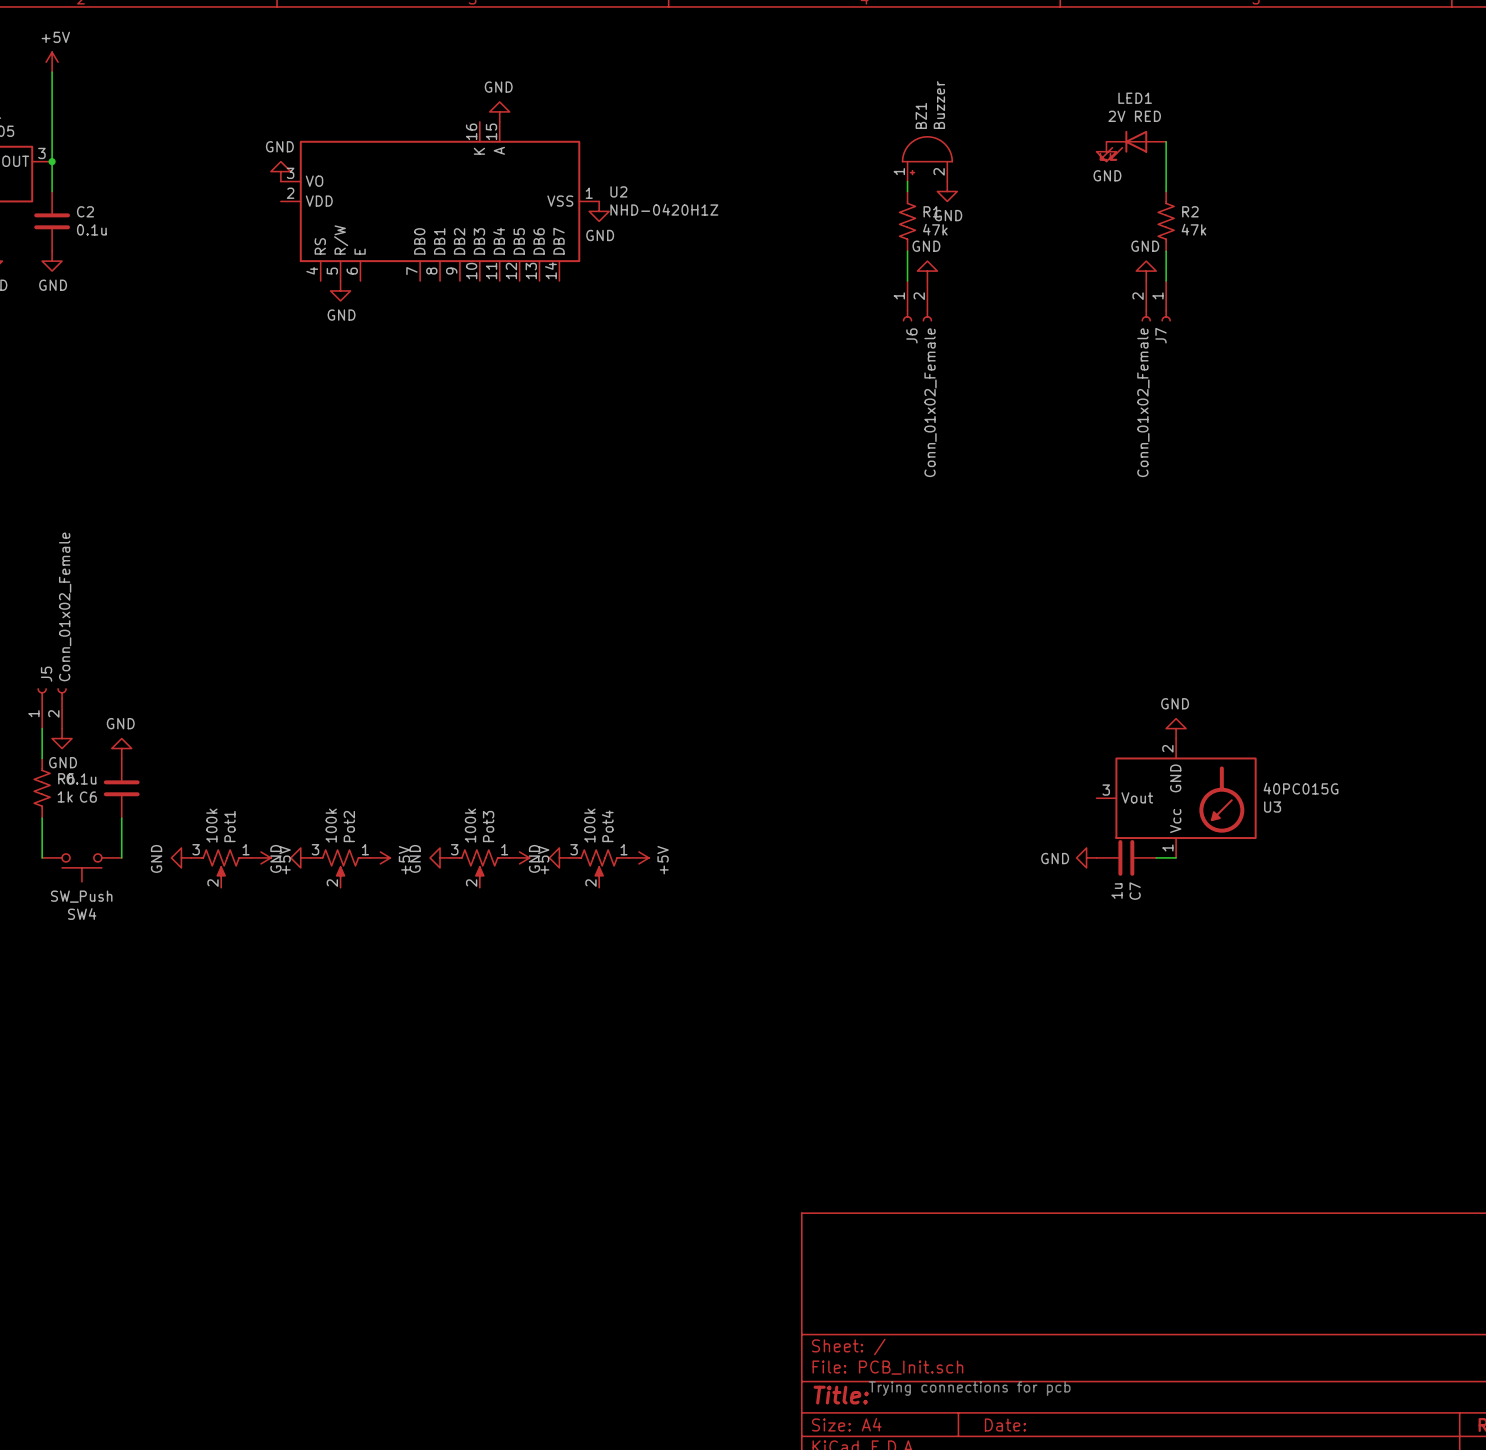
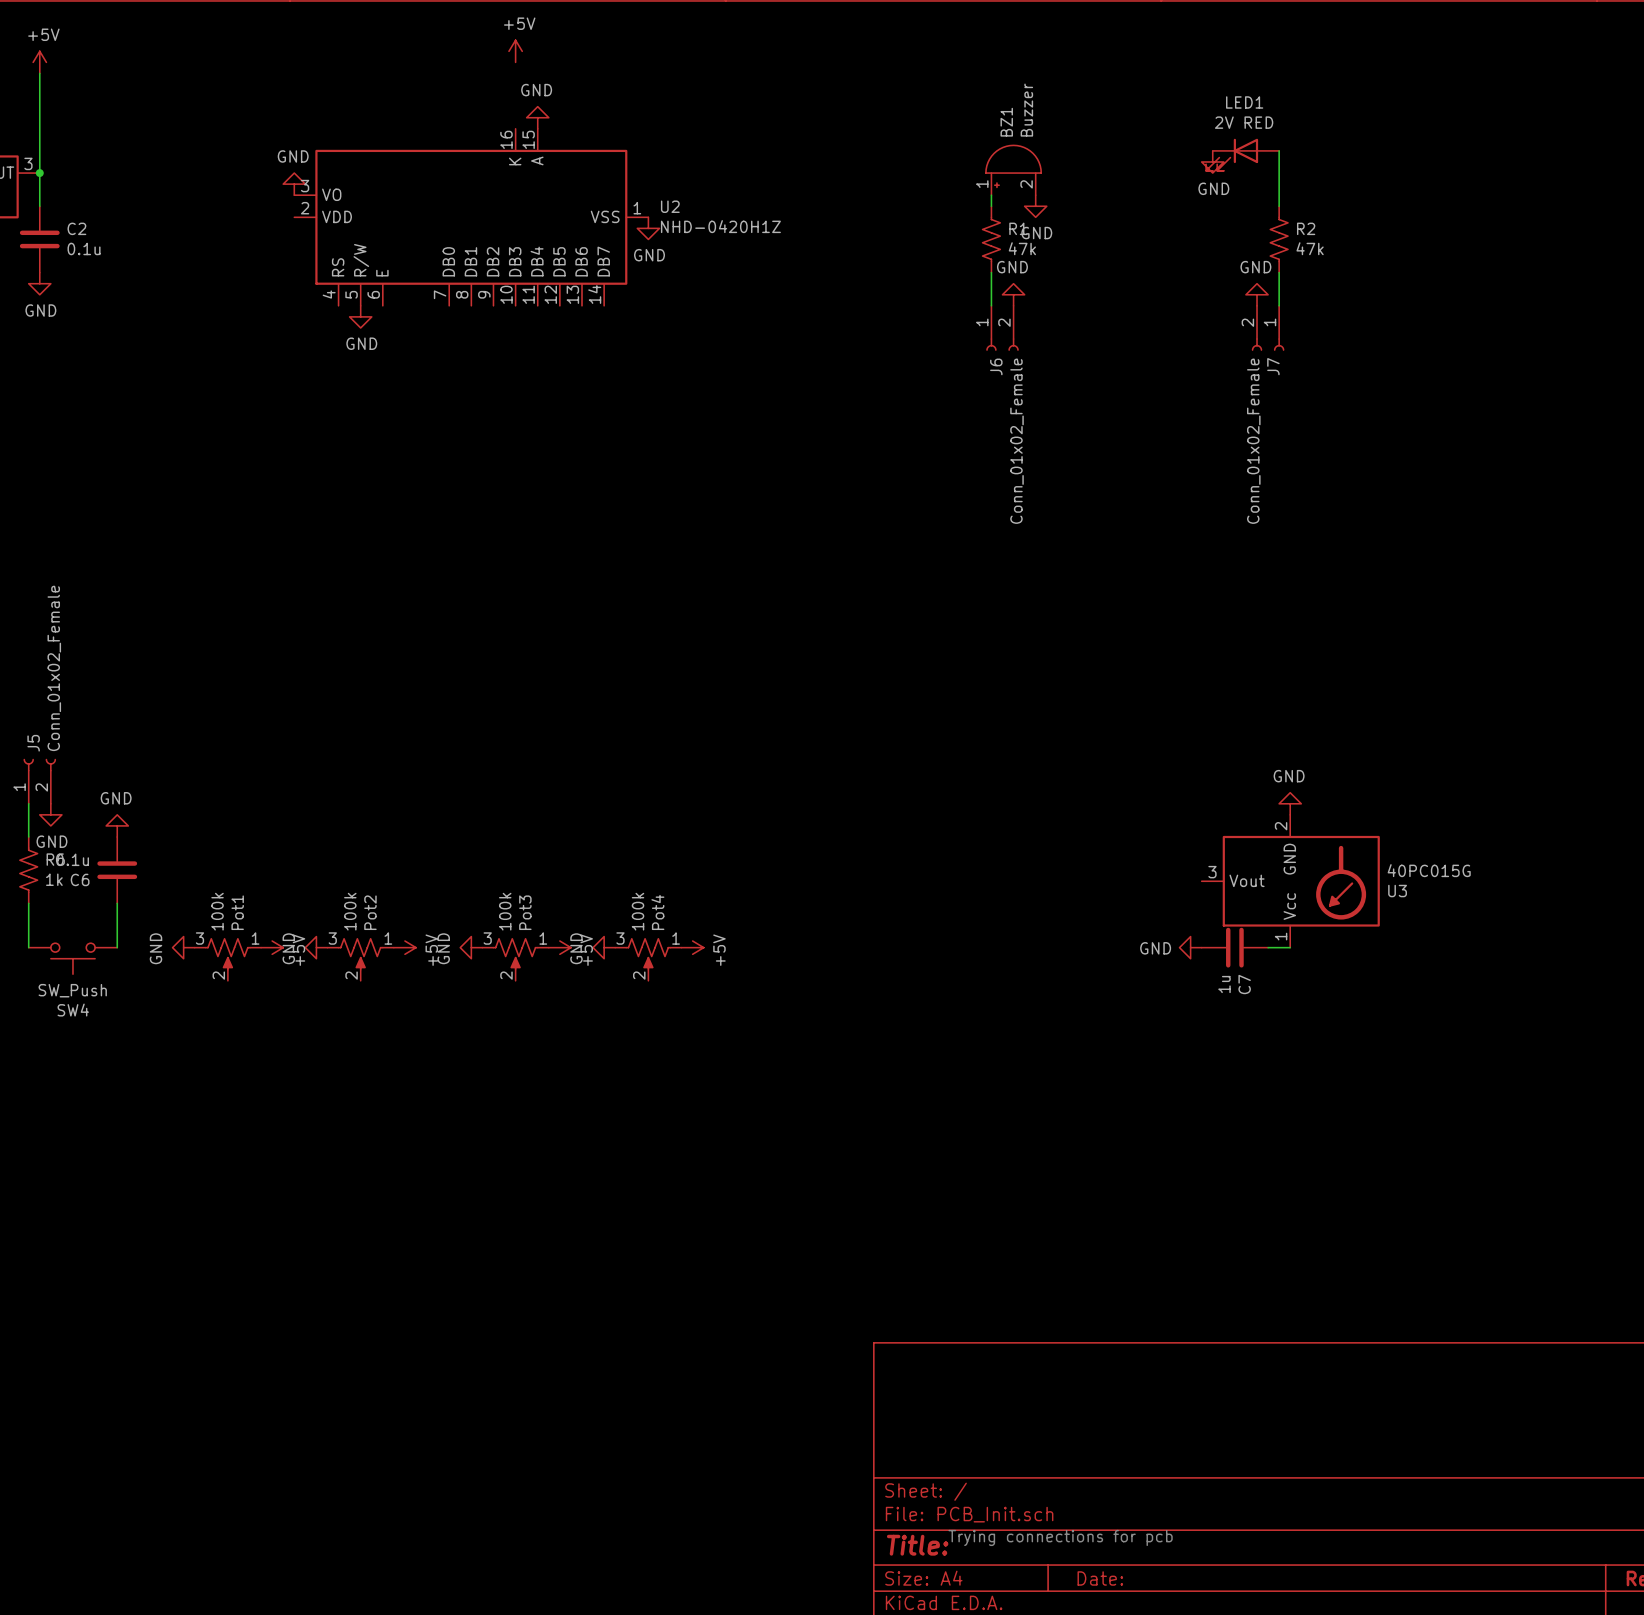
power symbol: none -> +5V (515, 51)

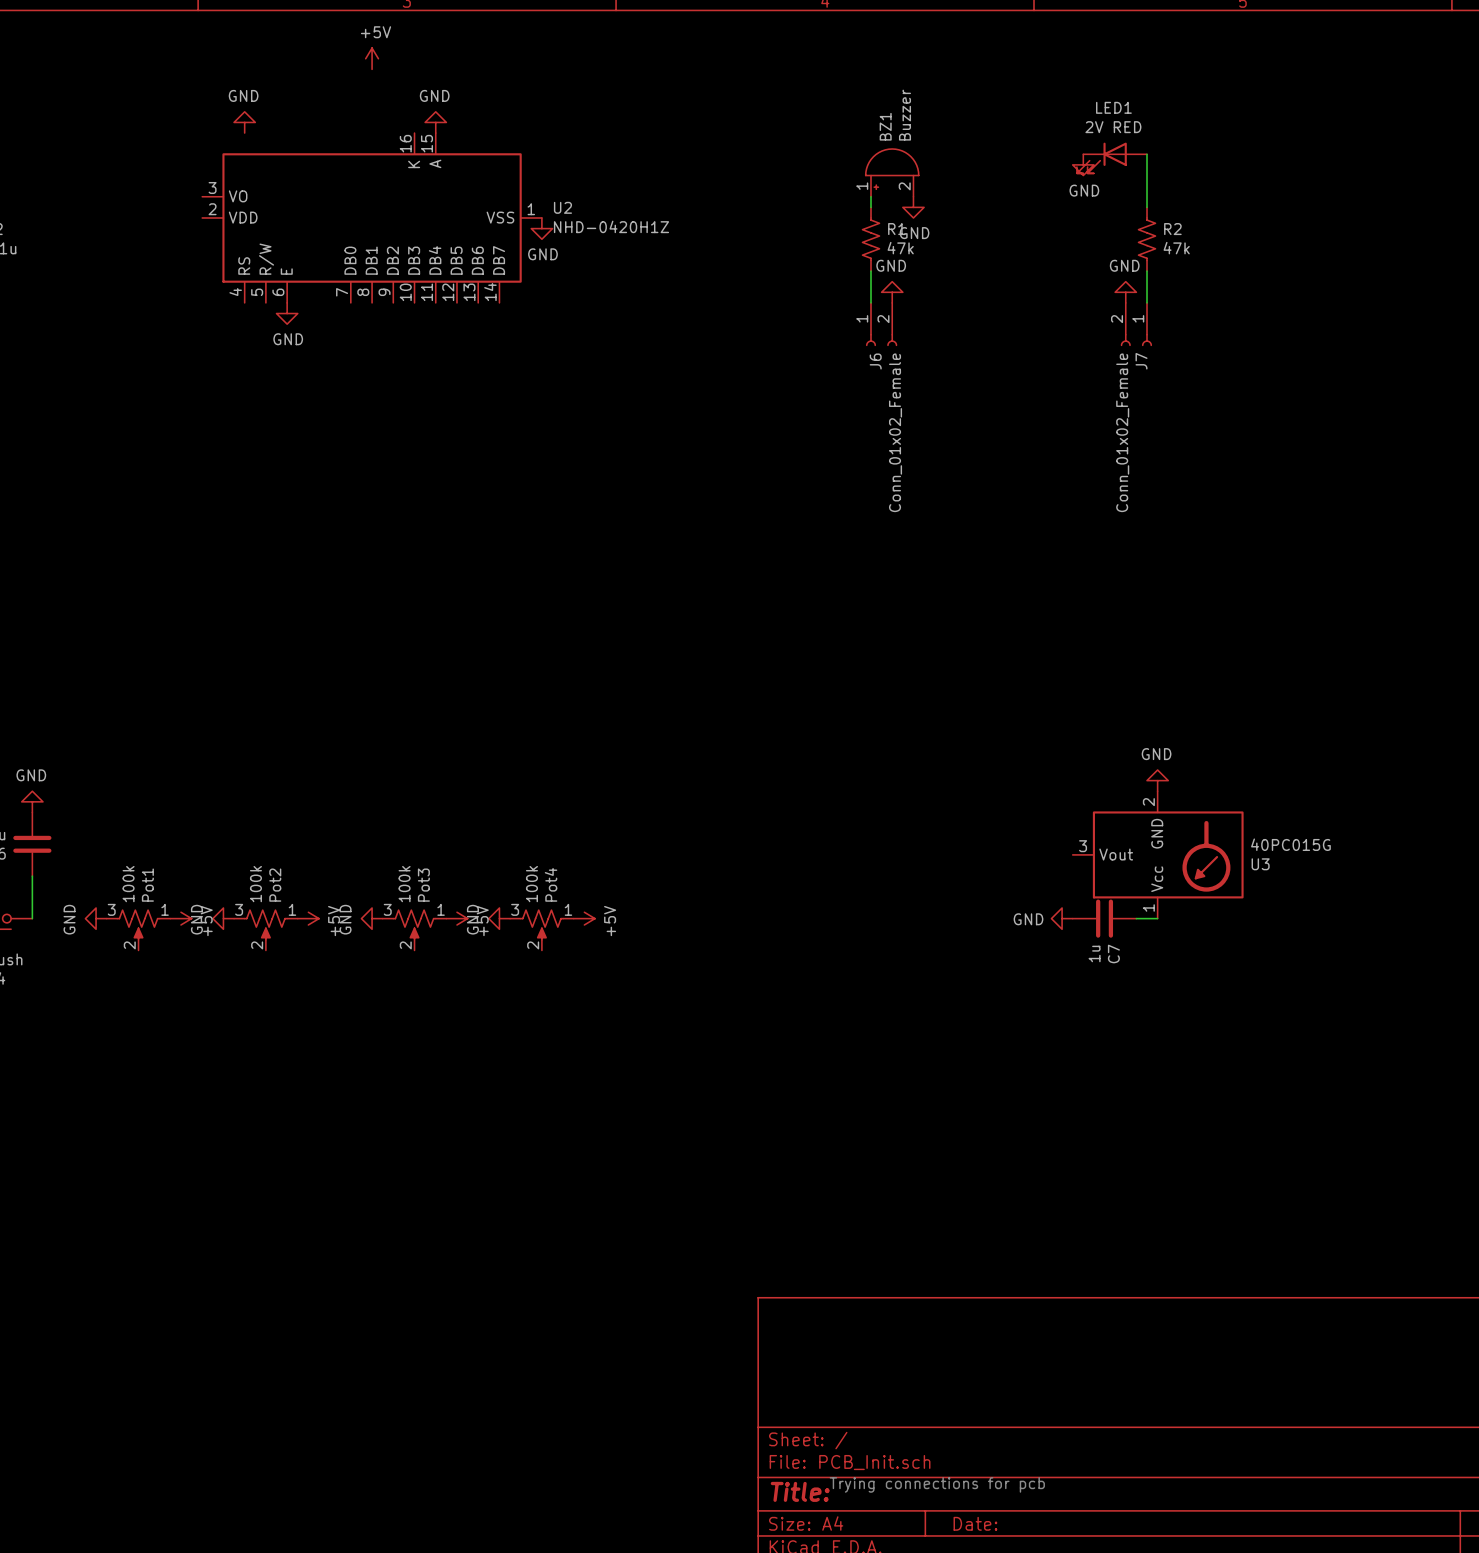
power symbol position: +5V (515, 51) -> +5V (372, 58)
power symbol: none -> GND (244, 122)
power symbol: GND (294, 184) -> none
power symbol position: GND (360, 316) -> GND (287, 313)

